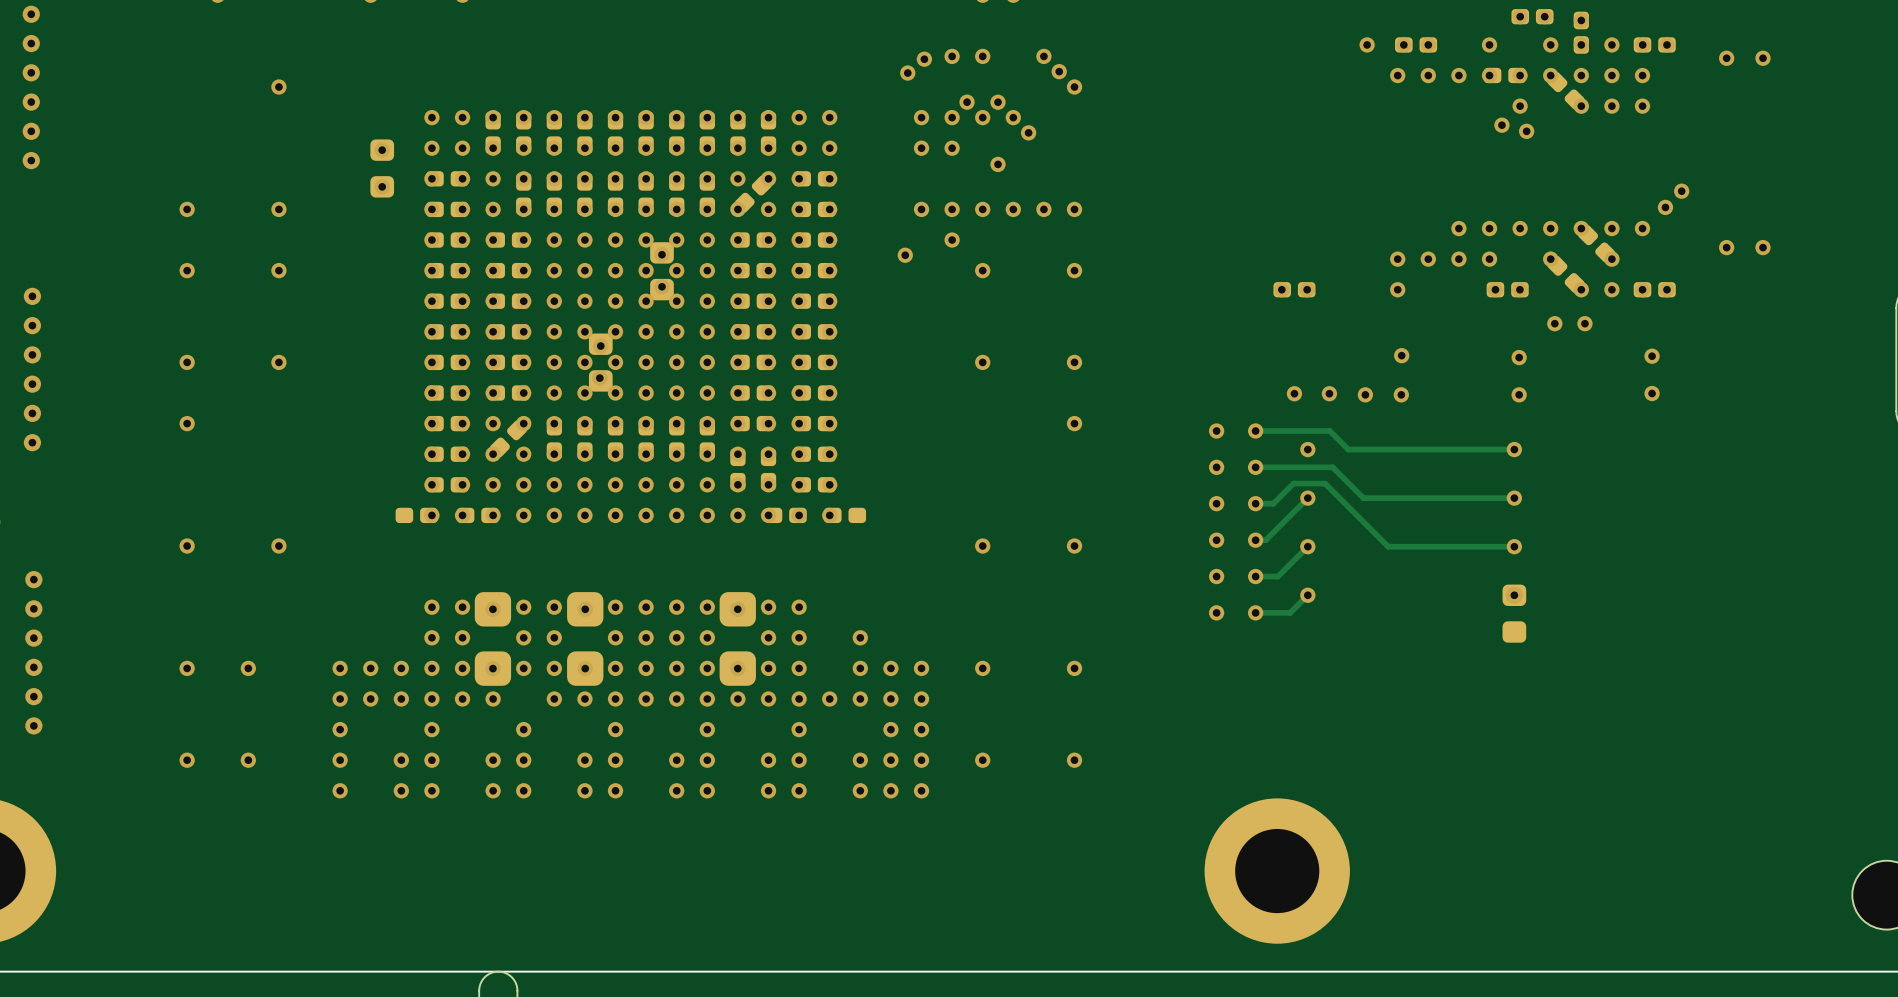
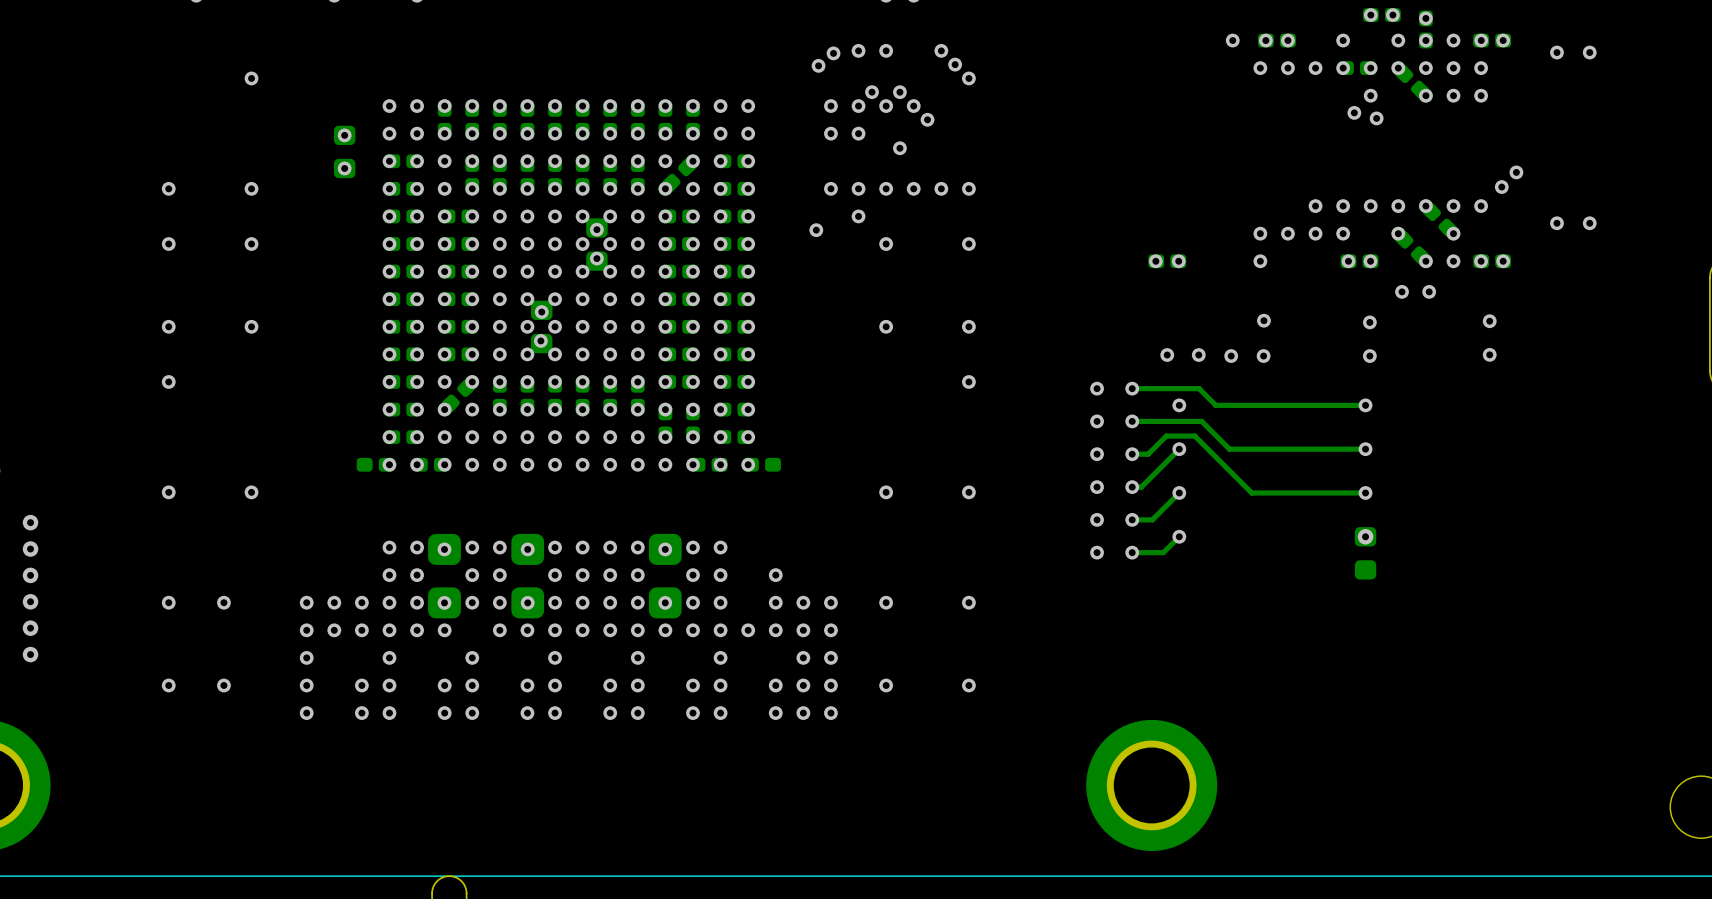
via: (31, 14) -> none
via: (31, 43) -> none
via: (31, 72) -> none
via: (31, 102) -> none
via: (31, 131) -> none
via: (31, 160) -> none
via: (32, 296) -> none
via: (32, 325) -> none
via: (32, 354) -> none
via: (32, 384) -> none
via: (32, 413) -> none
via: (32, 442) -> none

